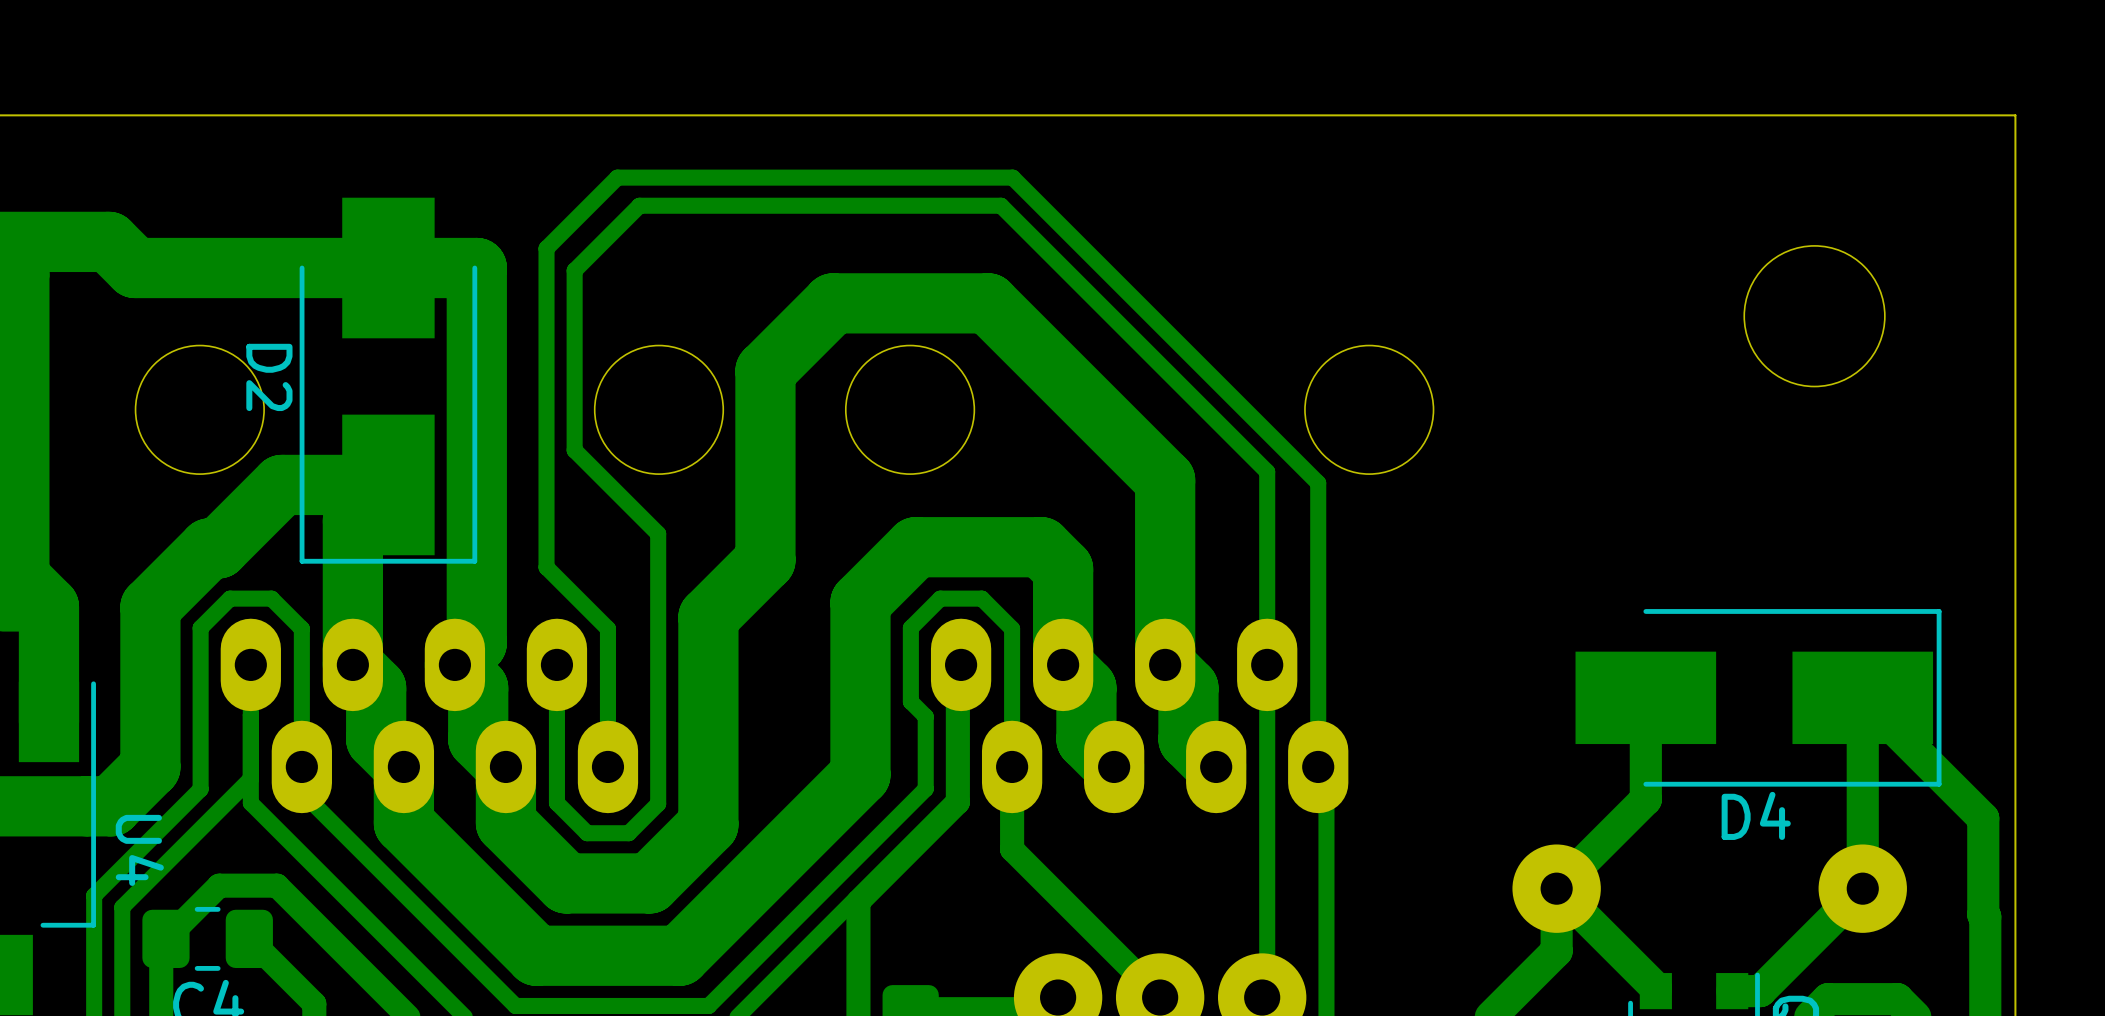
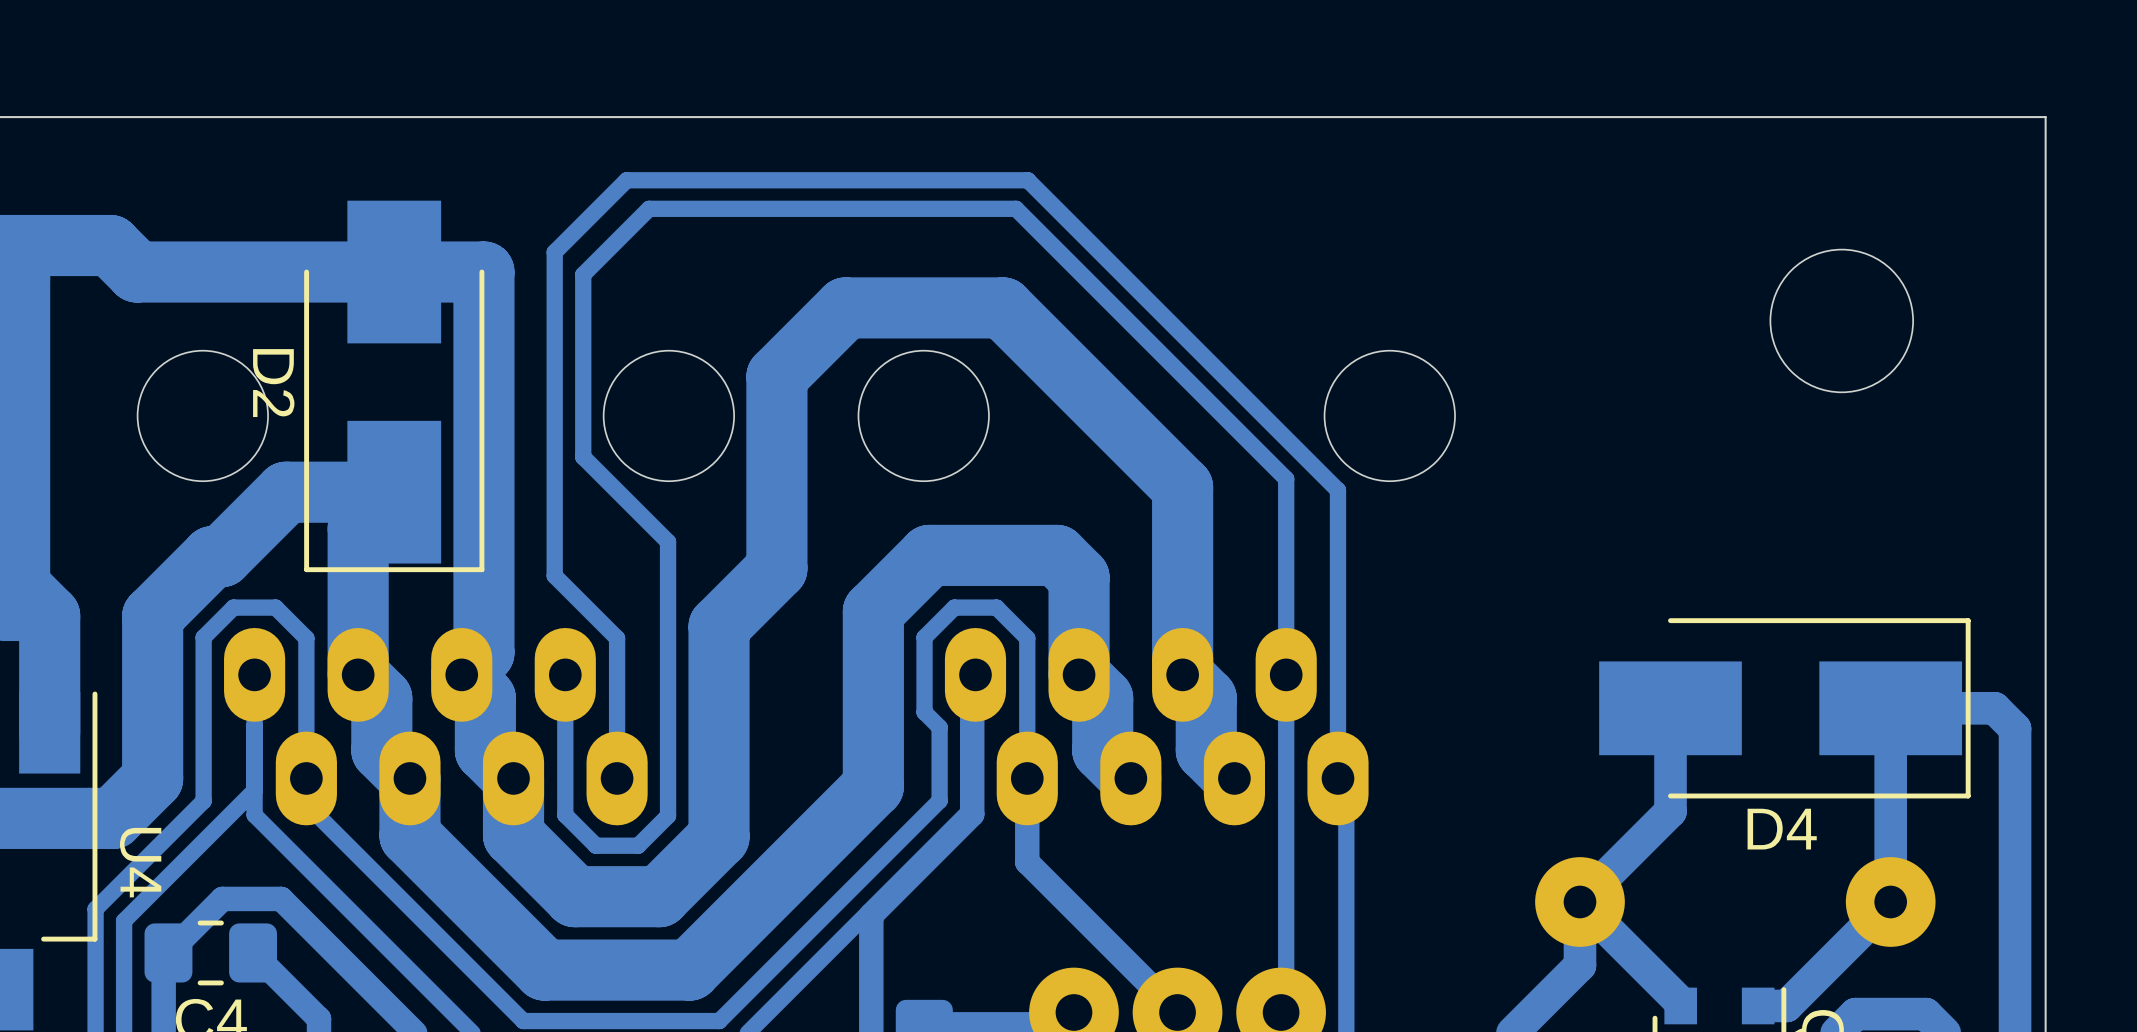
bottom track: (1862, 697) (1983, 818) (1983, 914) (1985, 916) -> (1890, 708) (1994, 708) (2015, 728) (2015, 930)

